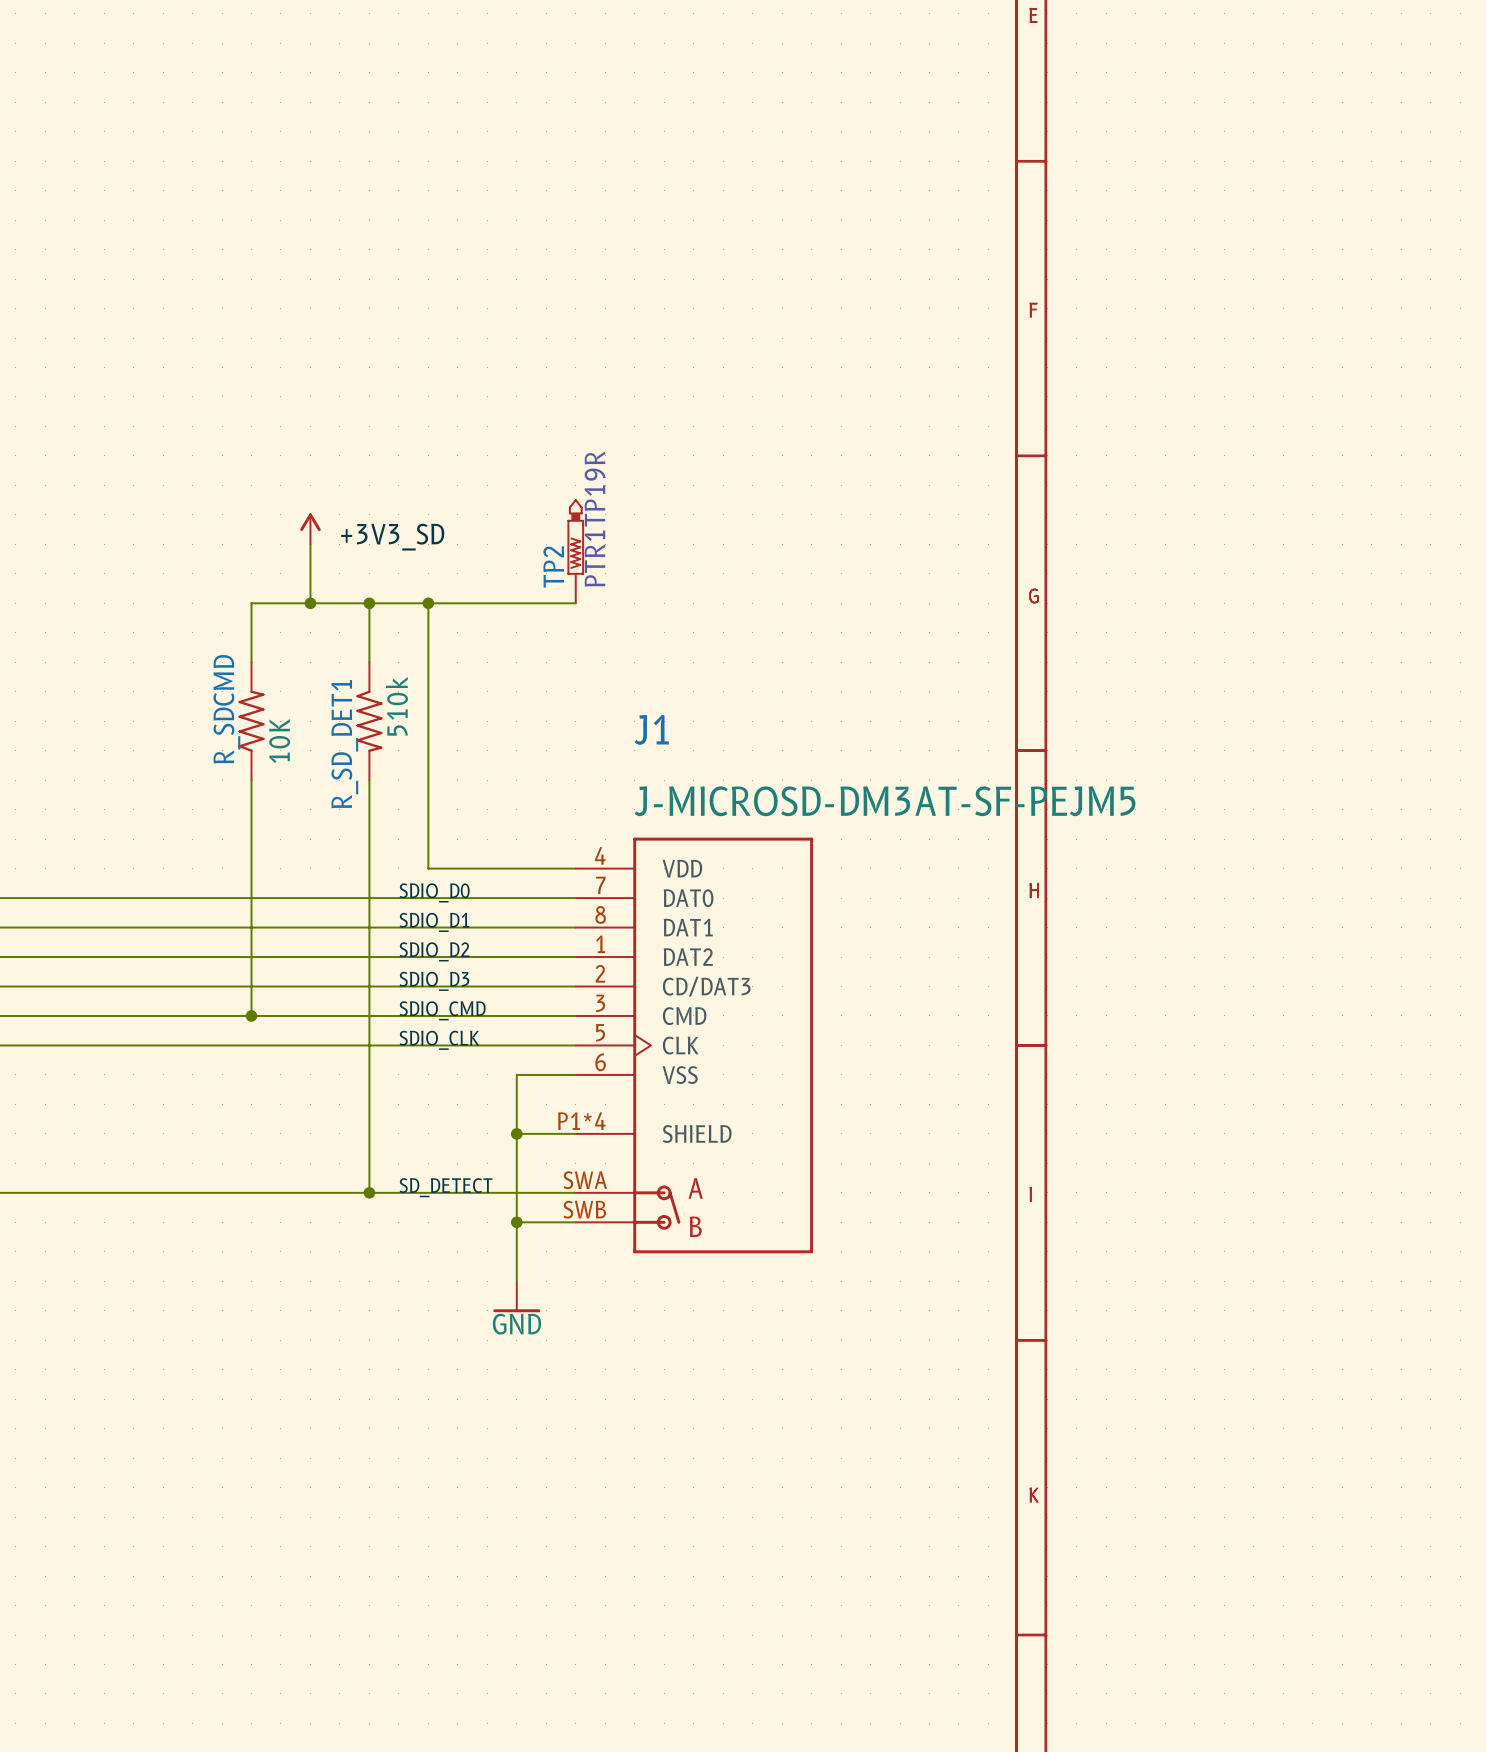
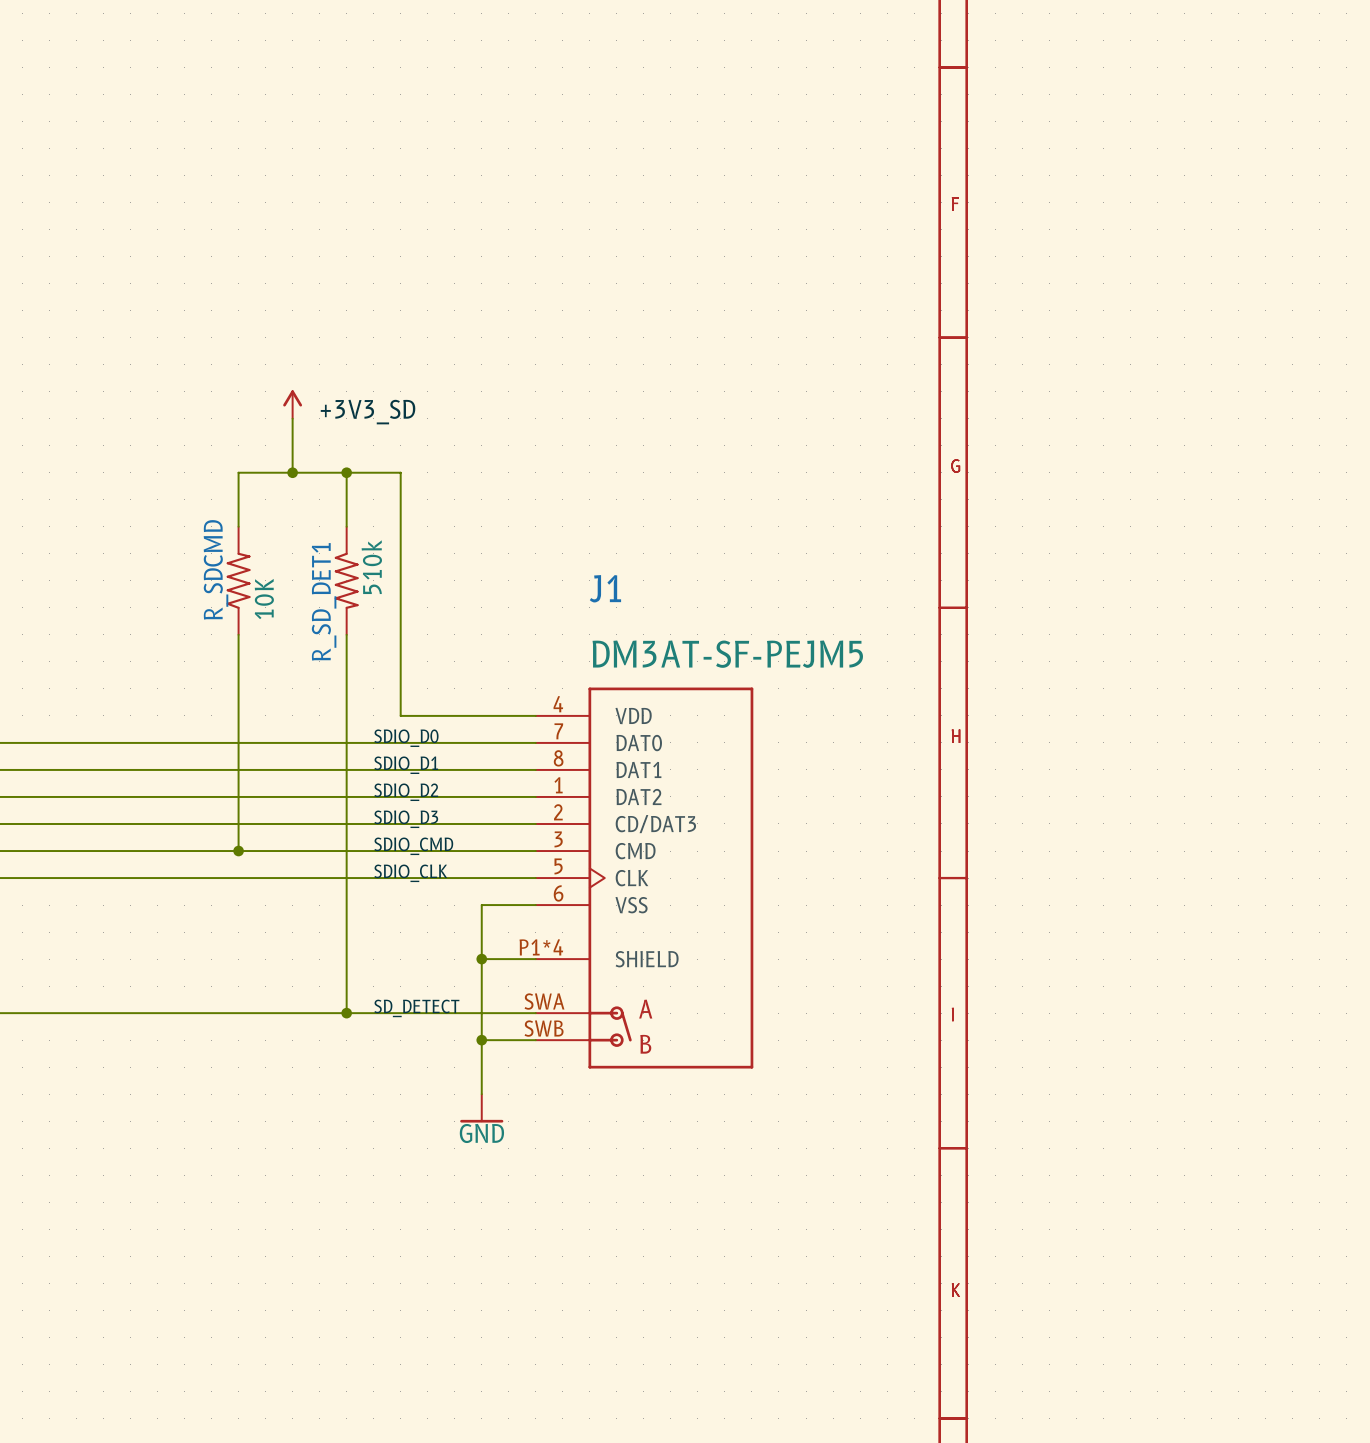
TP2: PTR1TP19R (575, 551) -> none
wire: (428, 603) (575, 603) -> none
junction: (428, 603) -> none
J1 value: J-MICROSD-DM3AT-SF-PEJM5 (885, 801) -> DM3AT-SF-PEJM5 (727, 654)

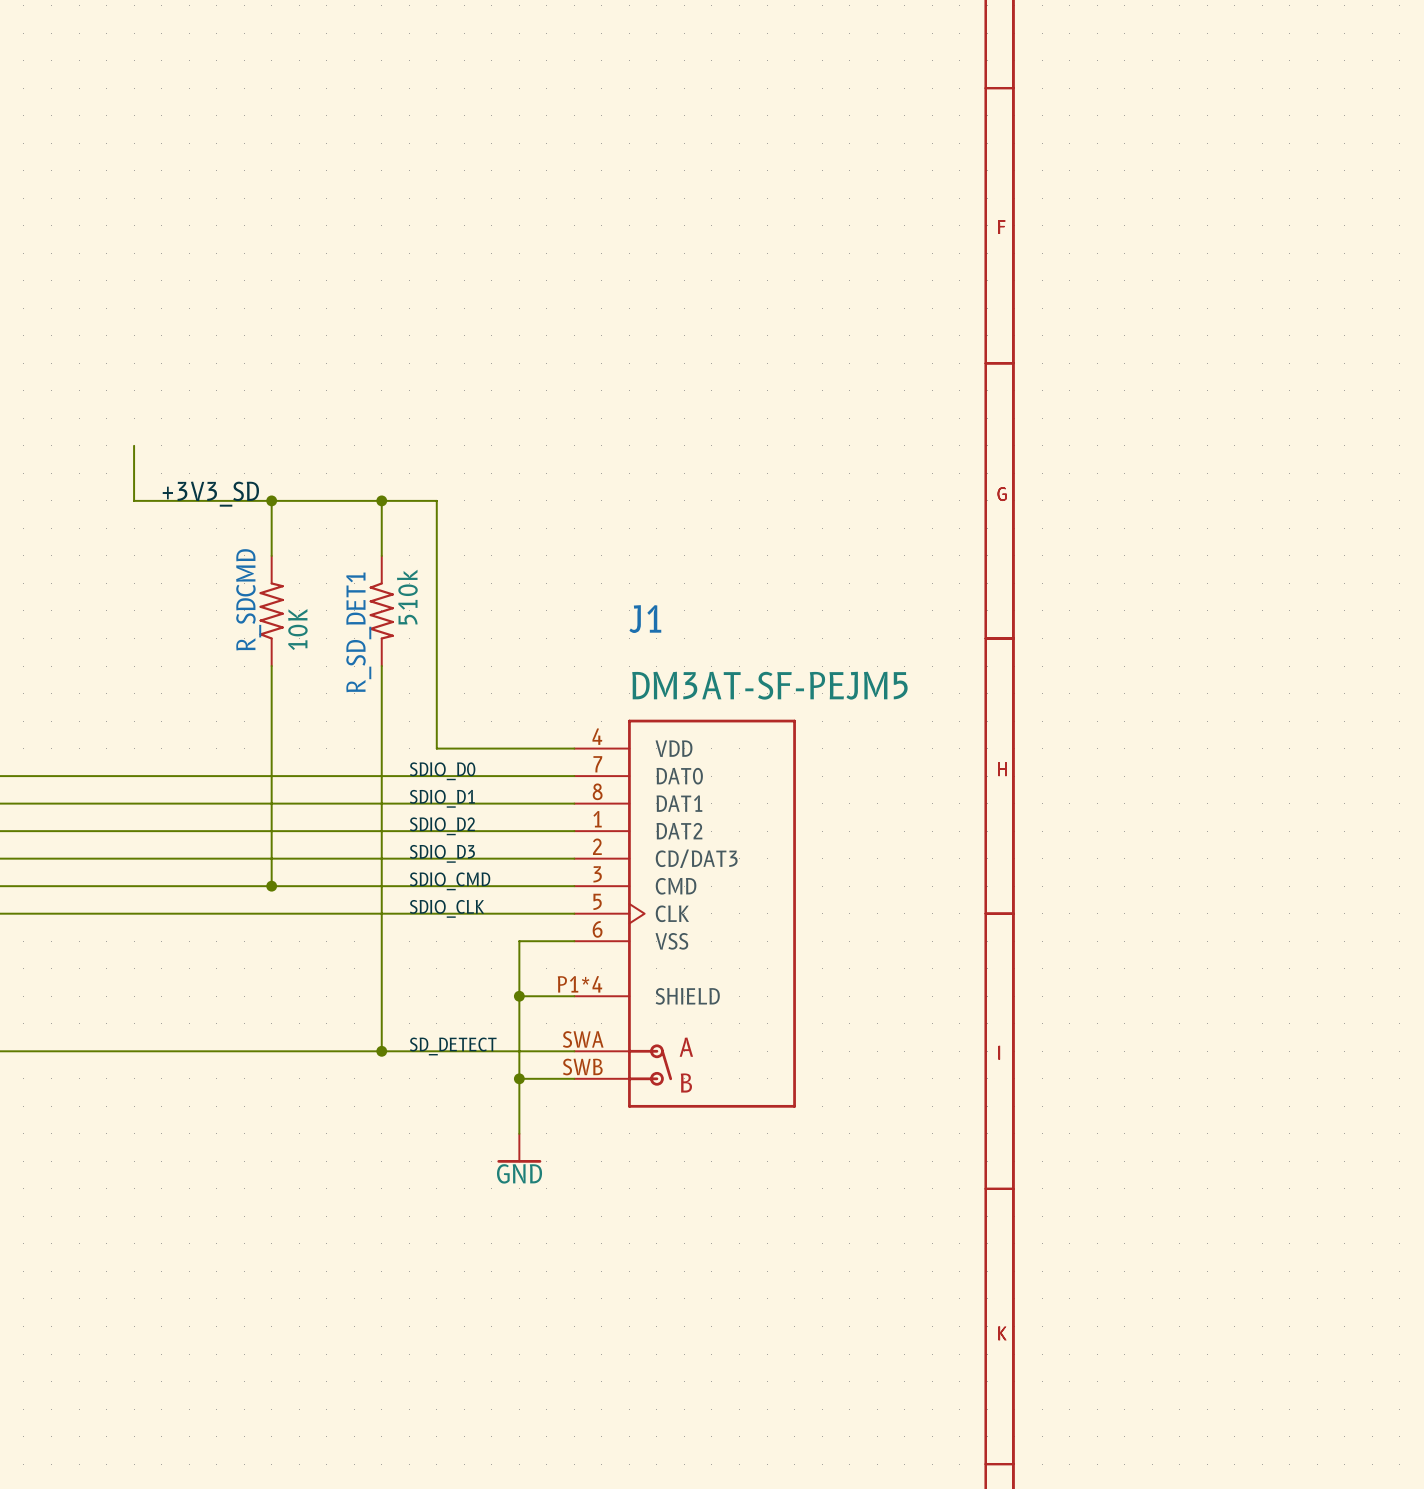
power symbol: (292, 404) -> none
label position: +3V3_SD (368, 412) -> +3V3_SD (210, 494)
wire: none -> (134, 445) (134, 500) (271, 500)
wire: (292, 418) (292, 472) -> none
junction position: (292, 472) -> (271, 500)

